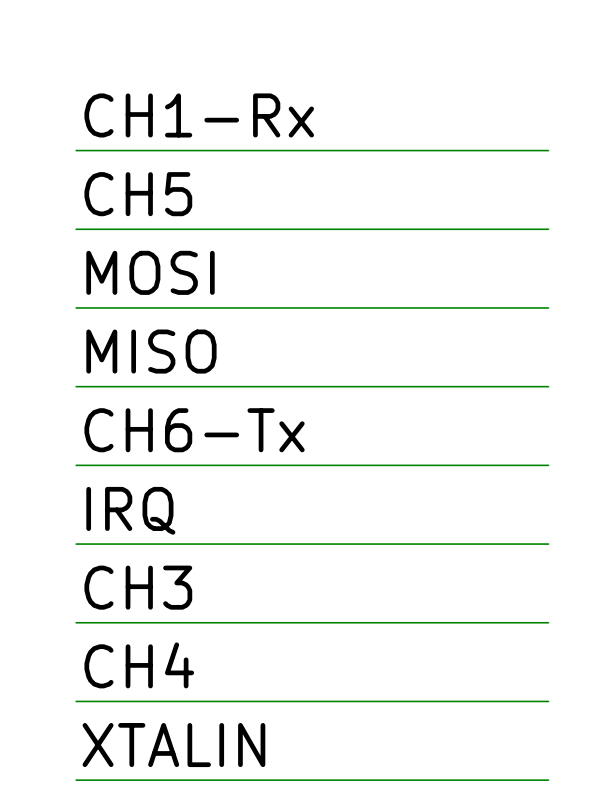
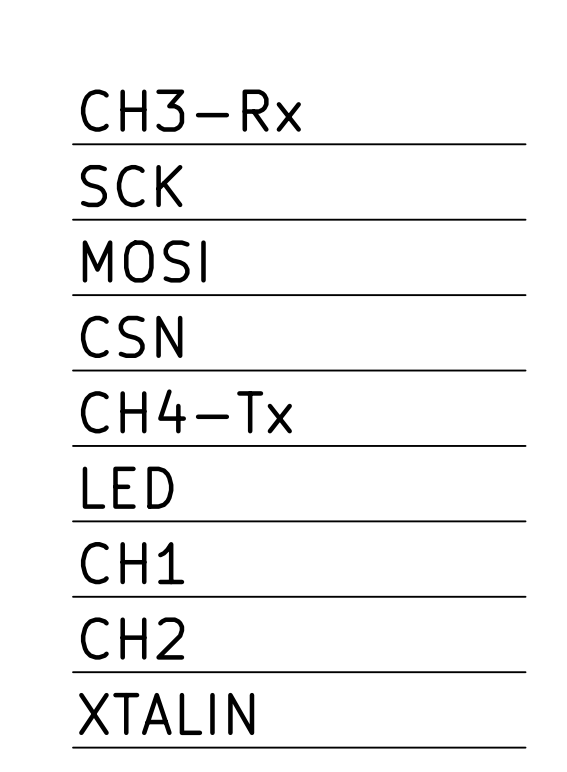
label: CH1-Rx (199, 115) -> CH3-Rx (190, 110)
label: CH5 (138, 194) -> SCK (131, 186)
label: MISO (151, 351) -> CSN (131, 336)
label: CH6-Tx (194, 430) -> CH4-Tx (186, 411)
label: IRQ (130, 510) -> LED (128, 487)
label: CH3 (138, 587) -> CH1 (132, 563)
label: CH4 (139, 665) -> CH2 (132, 638)

